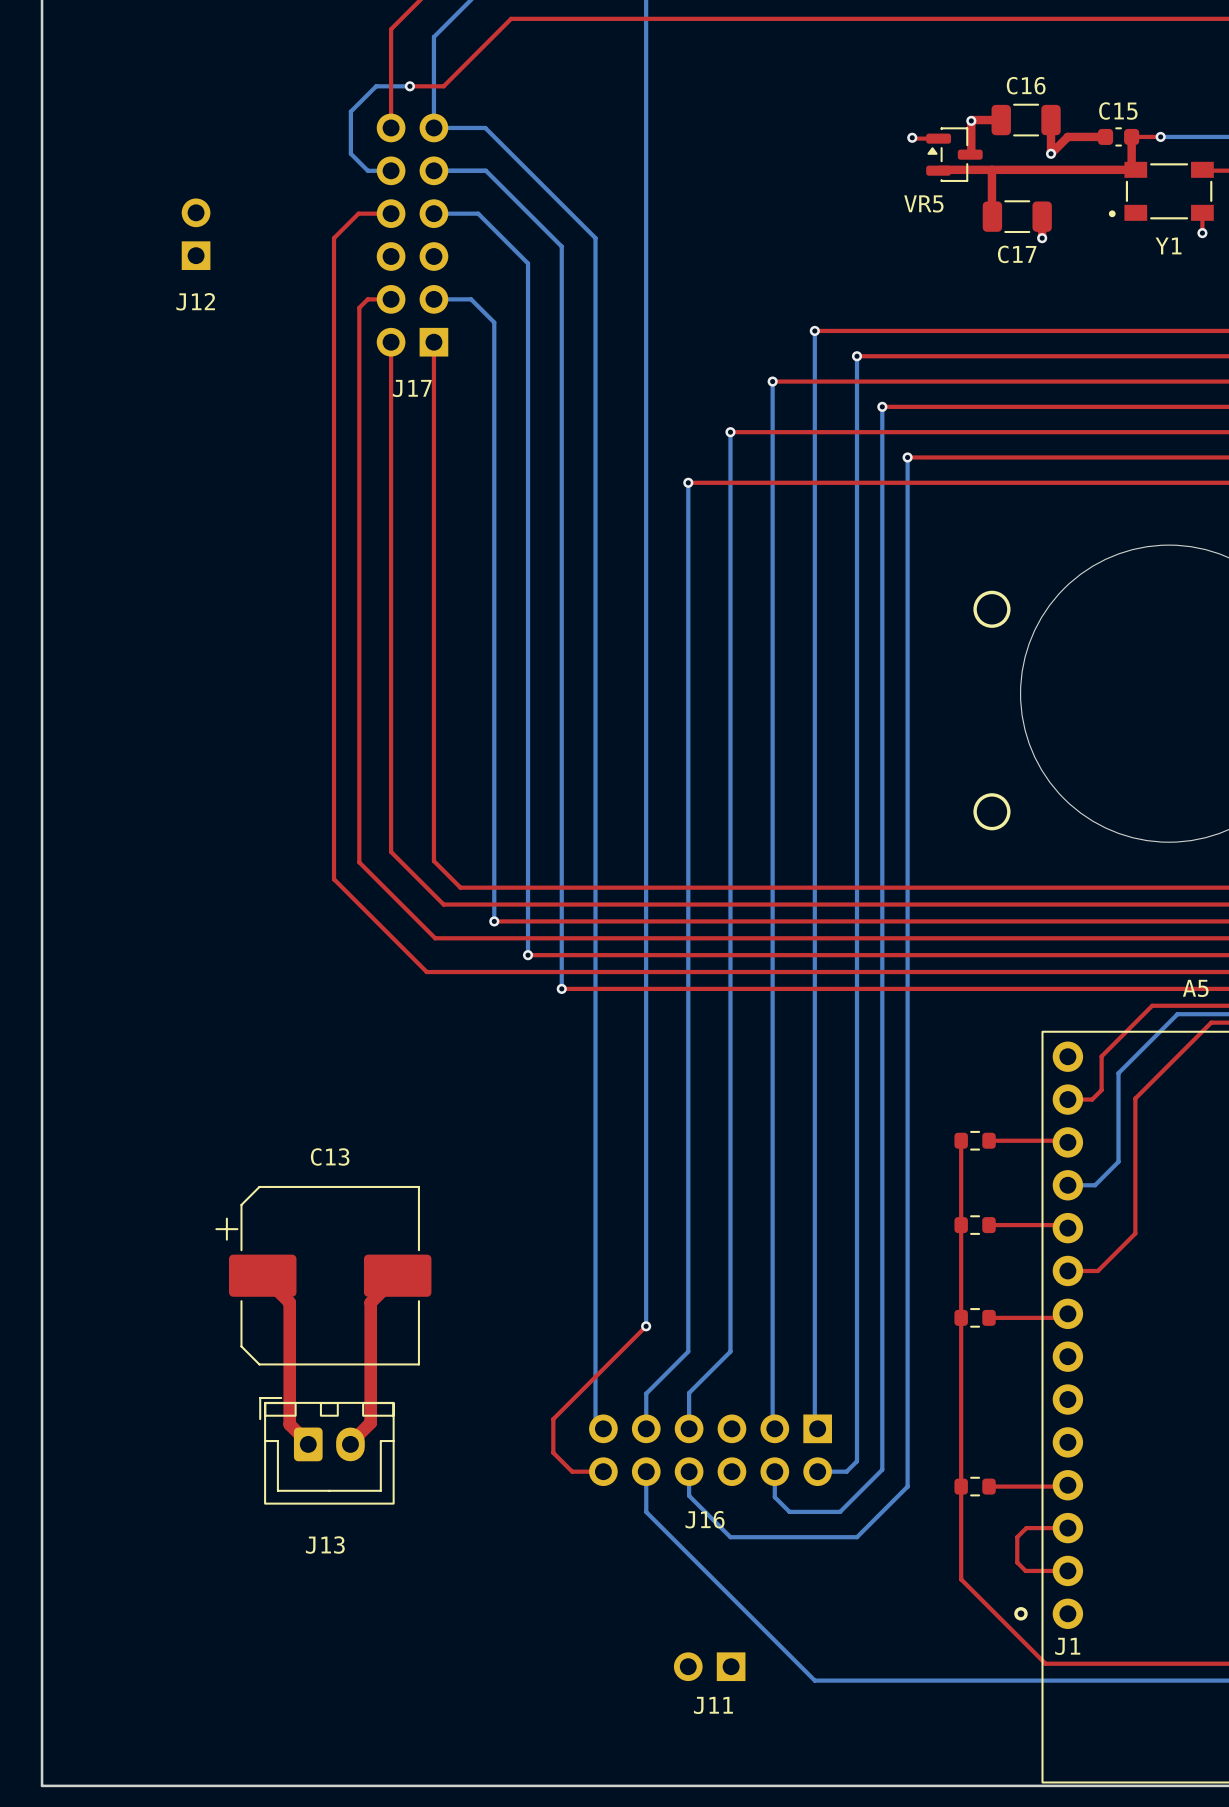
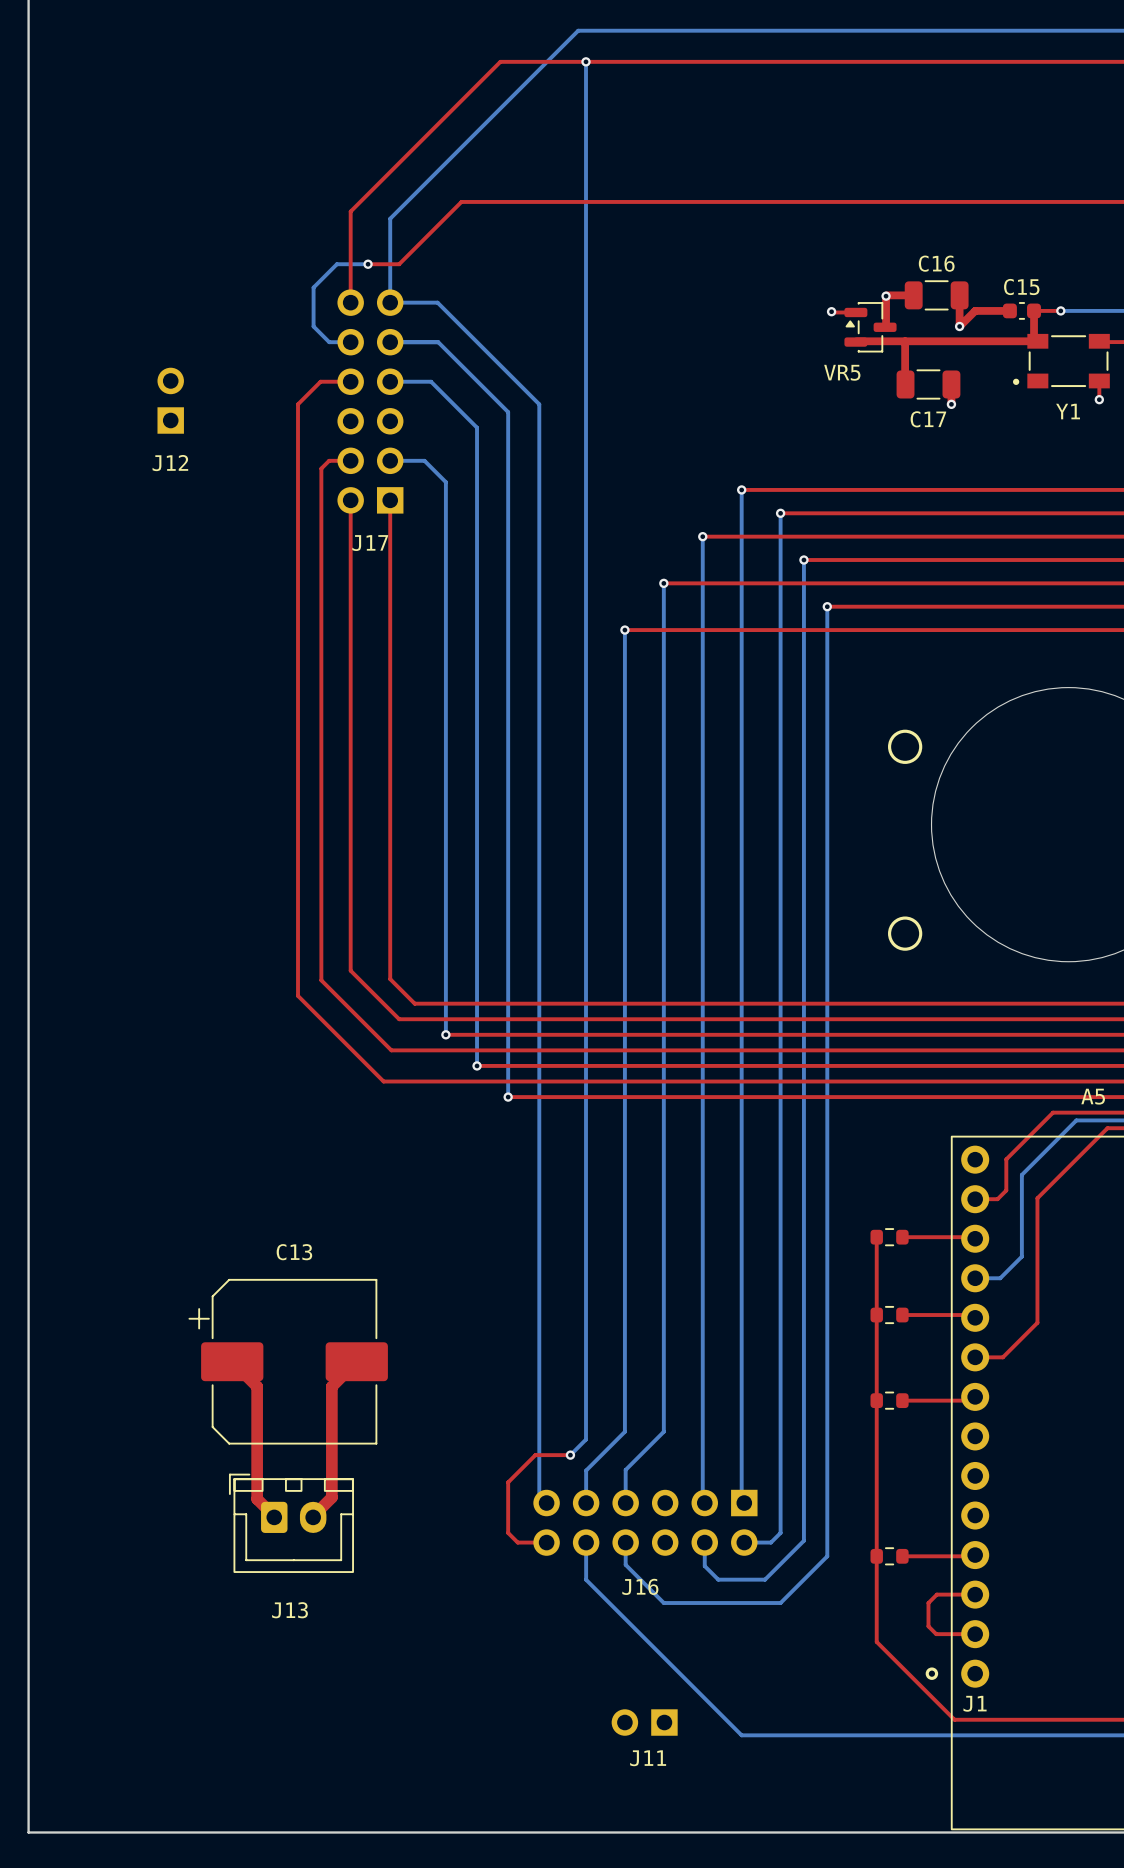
top track: (646, 1326) (553, 1419) (553, 1452) (561, 1461) -> (570, 1455) (535, 1455) (508, 1482) (508, 1532)
bottom track: none -> (586, 1408) (586, 1439) (570, 1455)
via position: (646, 1326) -> (570, 1455)

